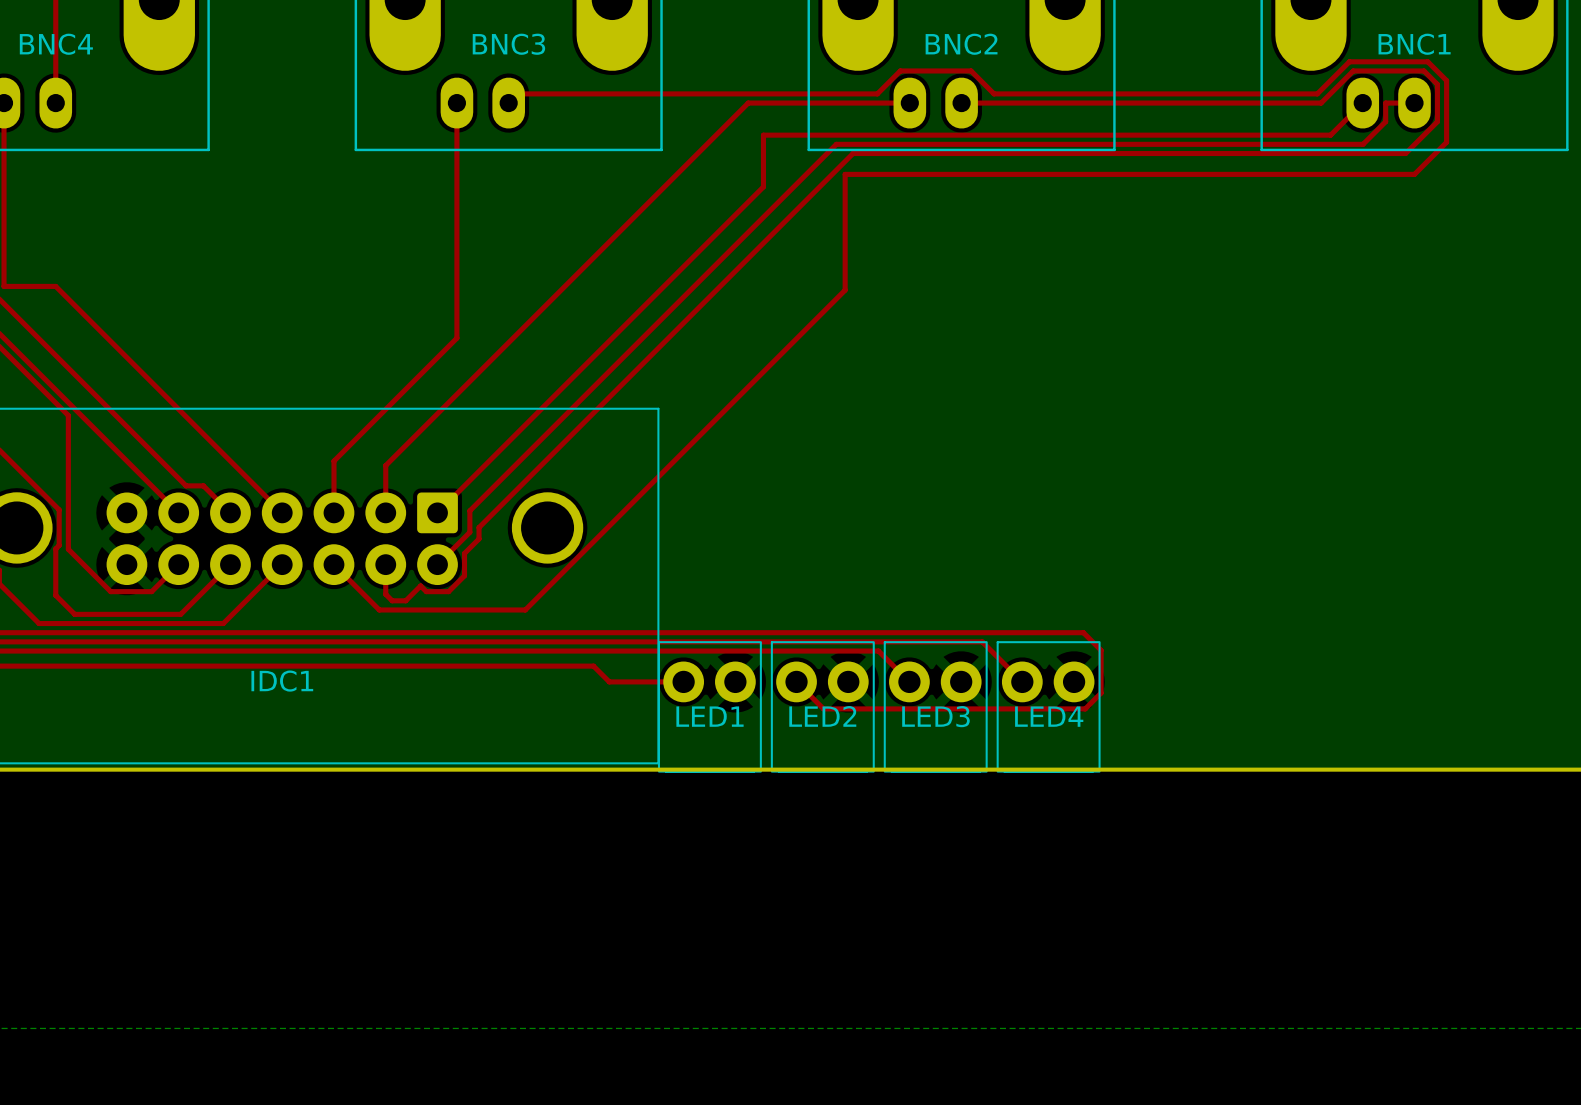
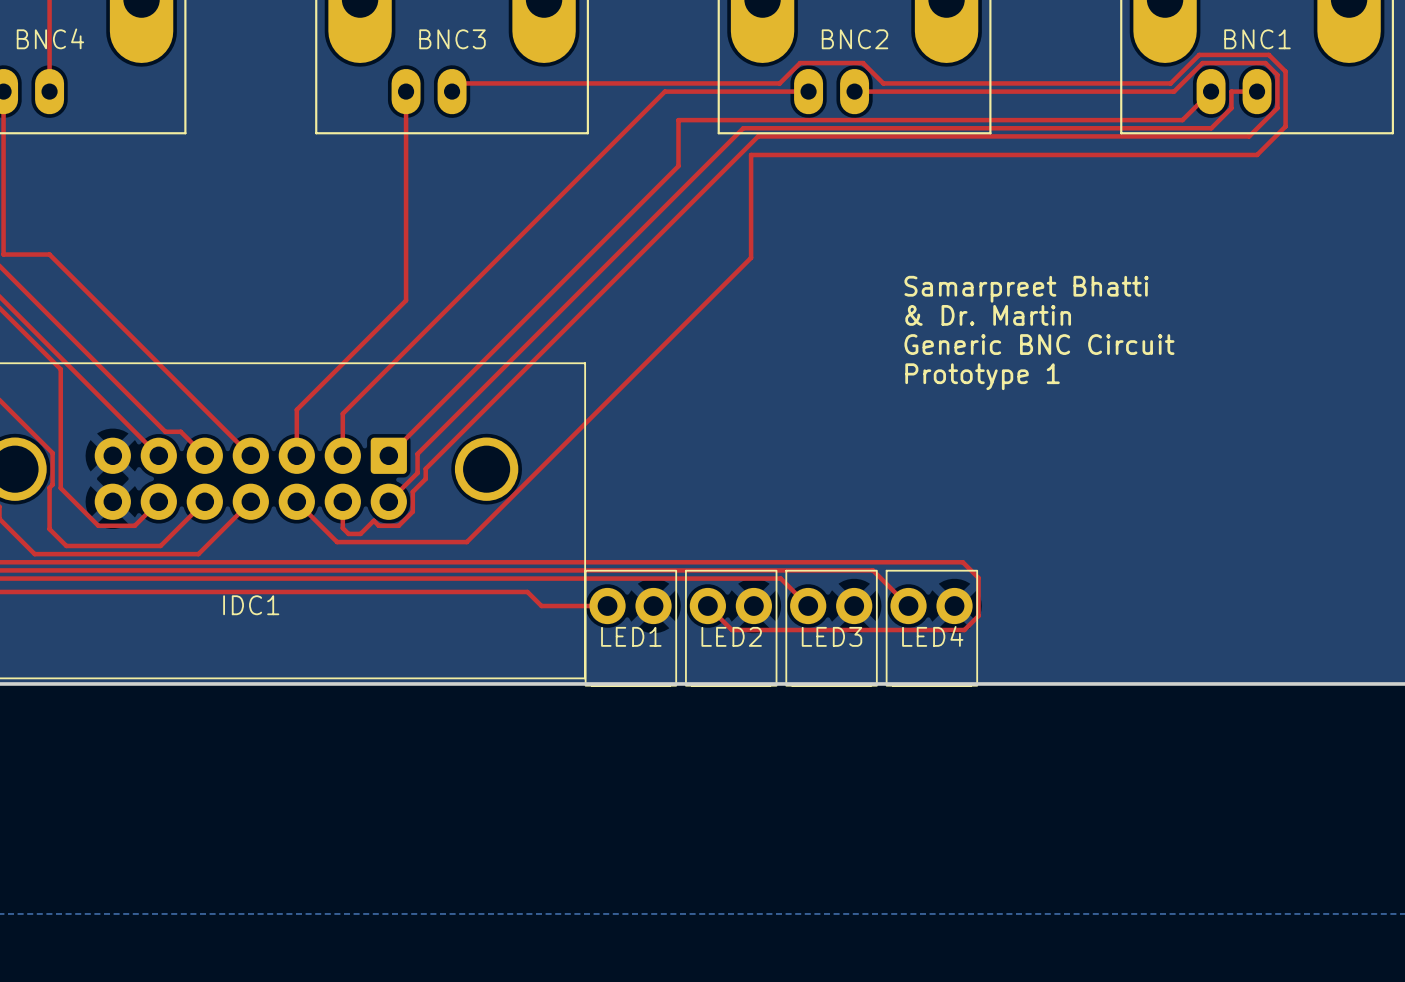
text: none -> Samarpreet Bhatti (1026, 289)
text: none -> & Dr. Martin (988, 315)
text: none -> Generic BNC Circuit (1039, 344)
text: none -> Prototype 1 (982, 376)

